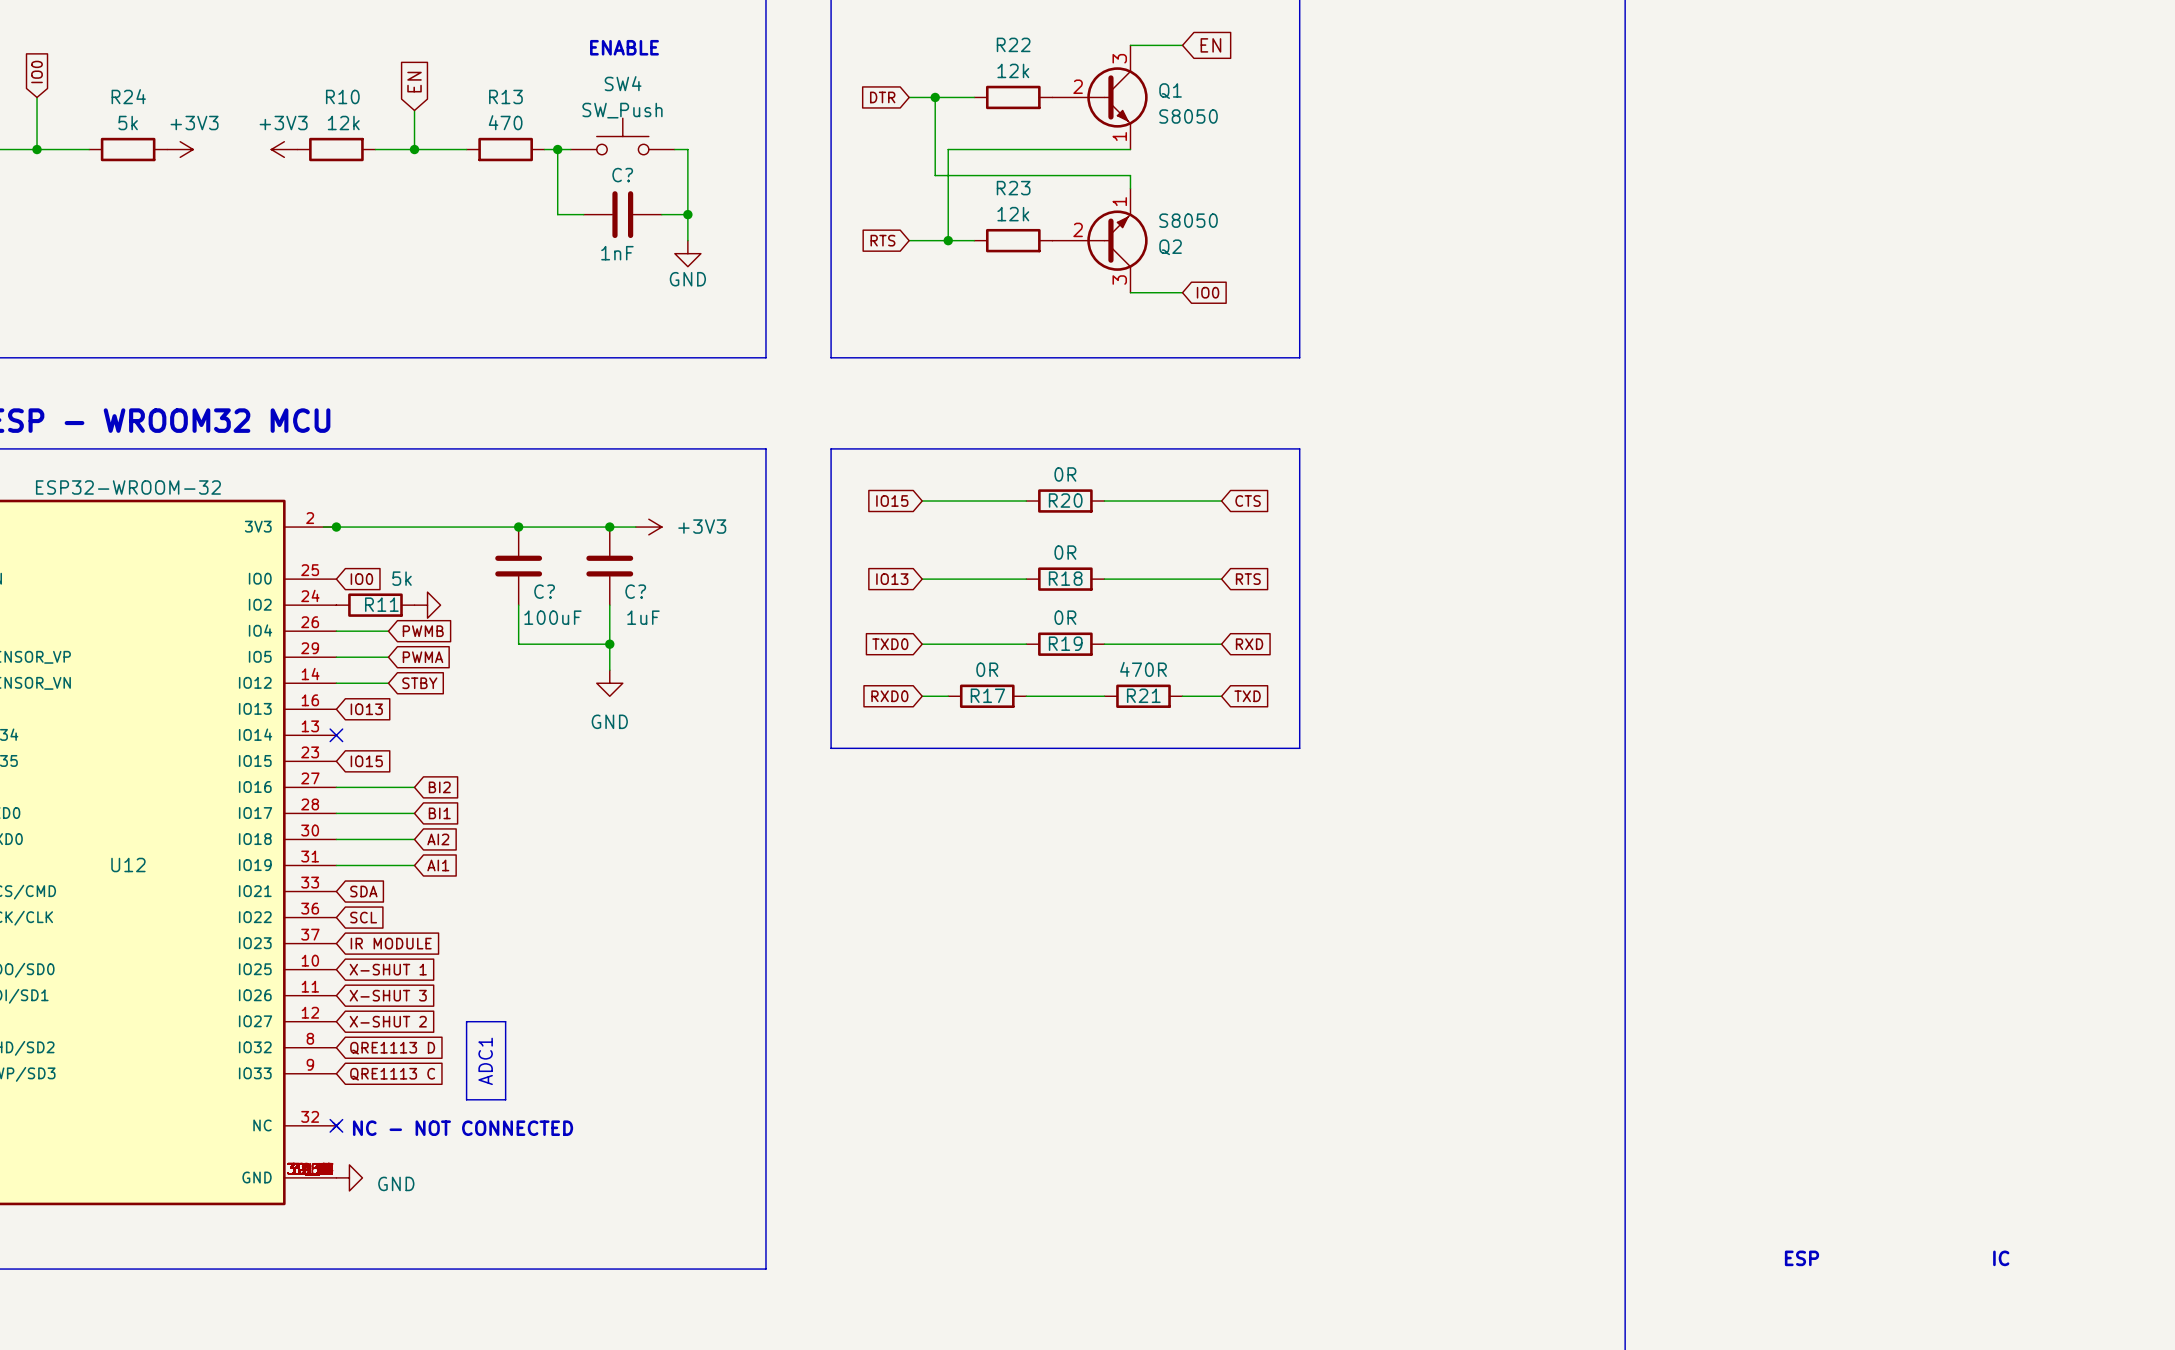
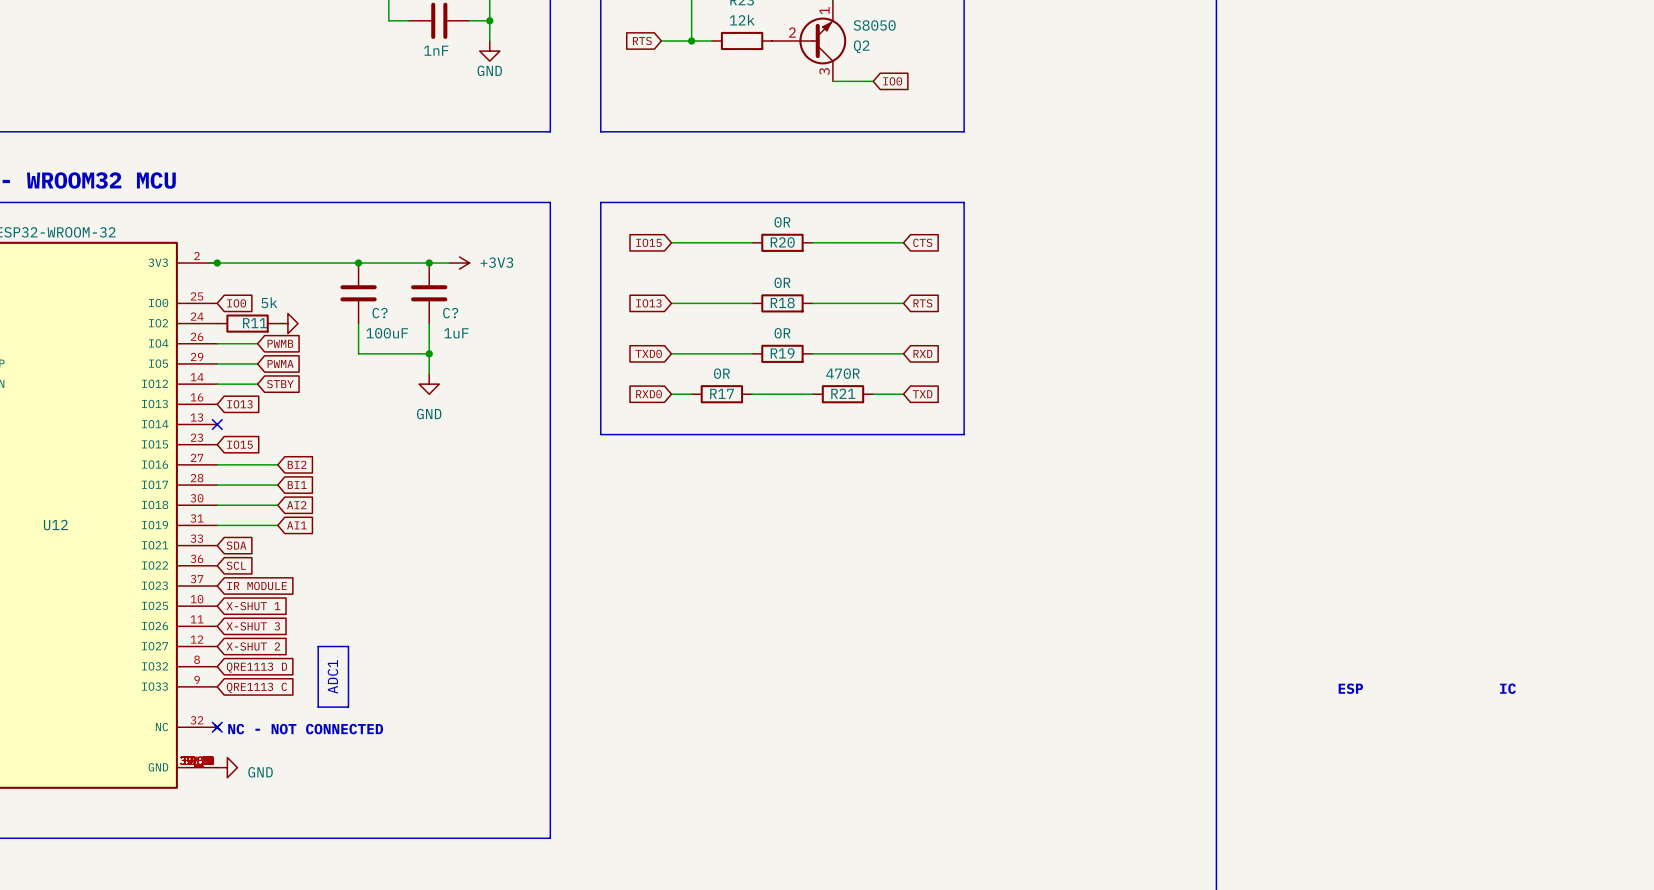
text position: ESP (1801, 1258) -> ESP (1350, 688)
text position: IC (2001, 1258) -> IC (1507, 688)

